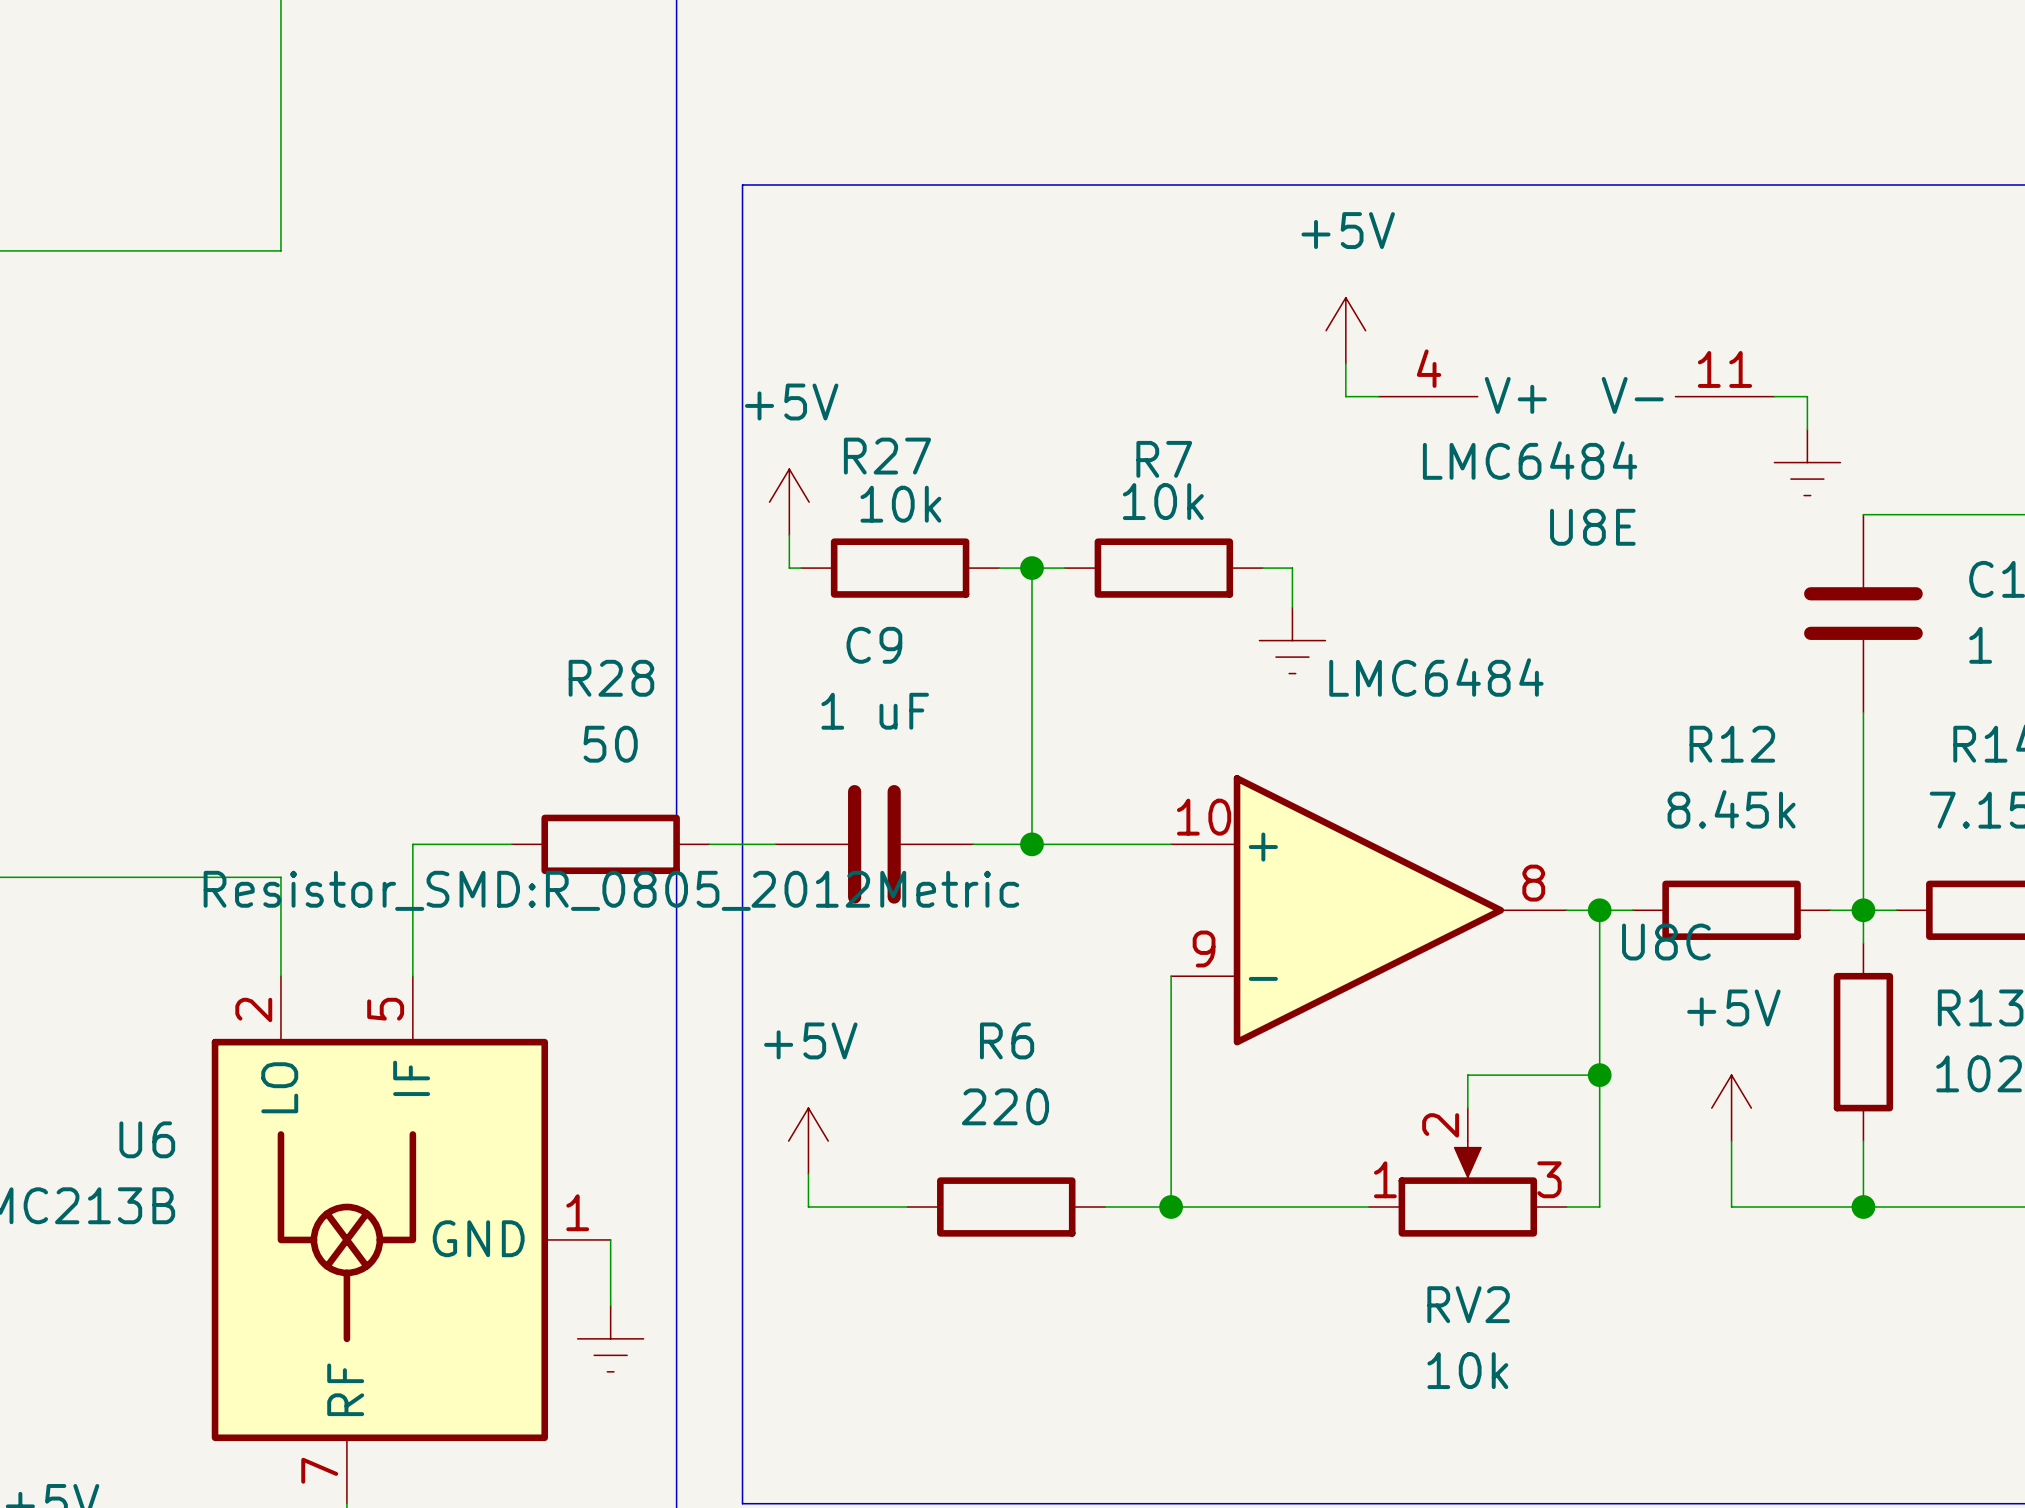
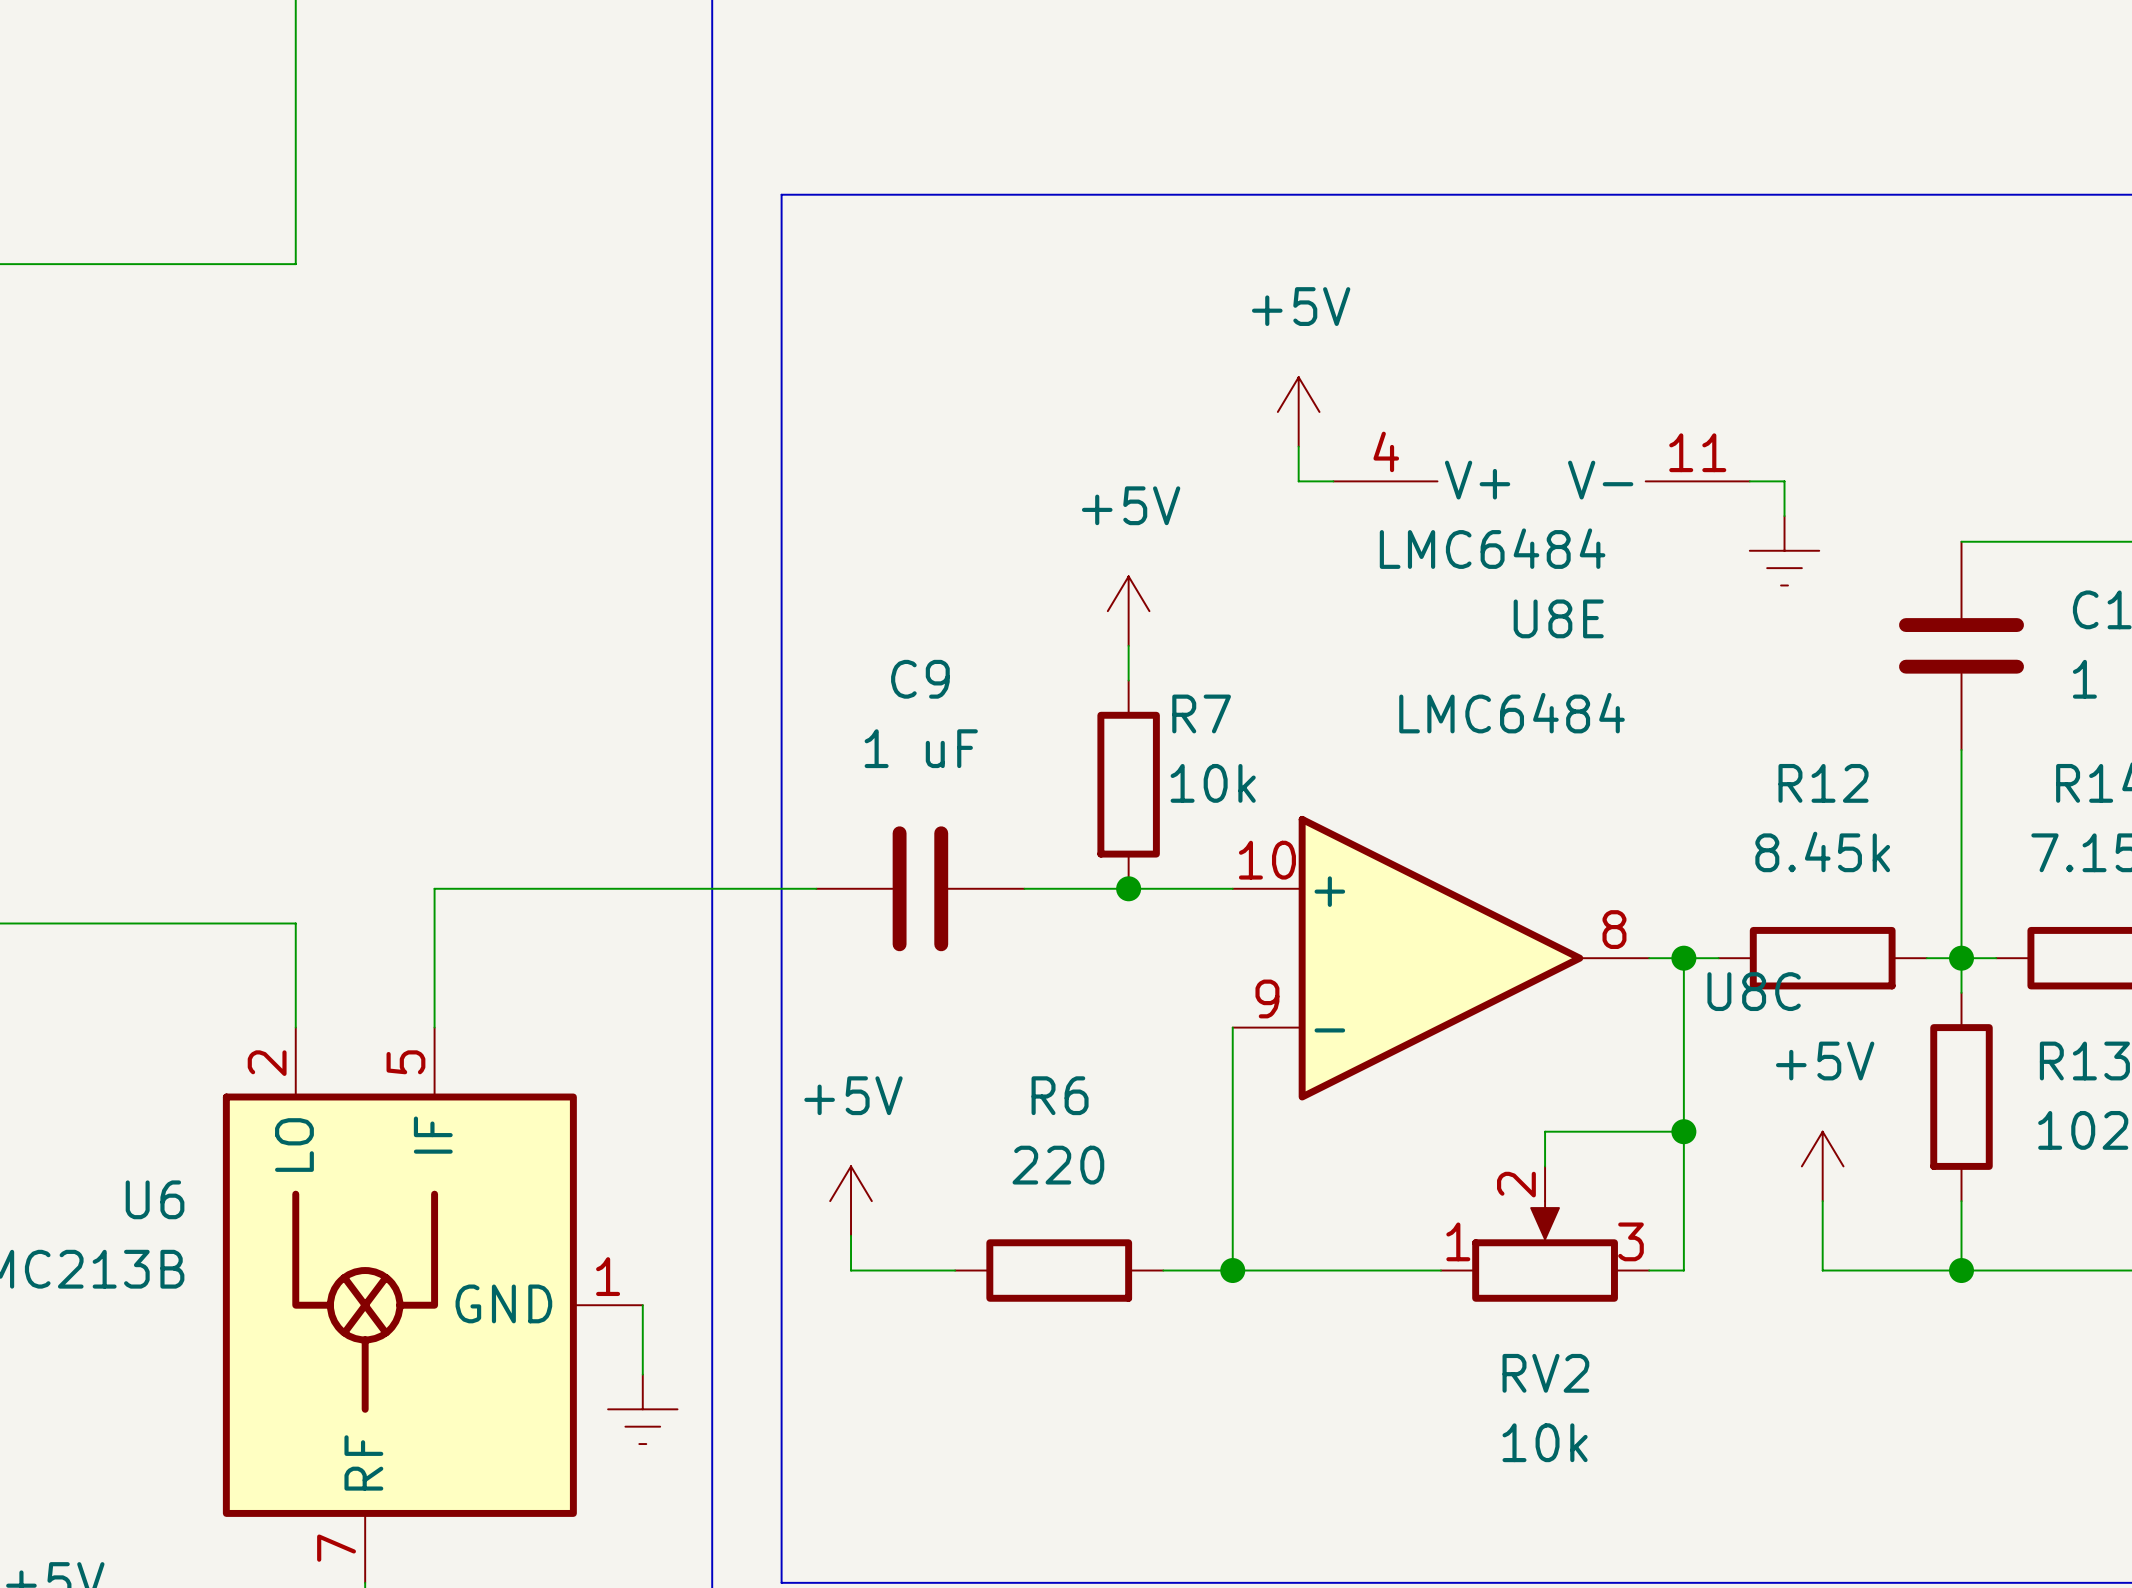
power symbol position: +5V (1345, 330) -> +5V (1298, 411)
wire: (1345, 363) (1345, 396) (1378, 396) -> (1298, 446) (1298, 481) (1333, 481)
U8E position: (1576, 396) -> (1541, 481)
wire: (1774, 396) (1807, 396) (1807, 429) -> (1749, 481) (1784, 481) (1784, 516)
R7 name position: R7 (1164, 459) -> R7 (1201, 713)
power symbol position: (1807, 462) -> (1784, 550)
power symbol: +5V (789, 502) -> none
wire: (789, 535) (789, 568) (801, 568) -> none
R27: 10k (900, 568) -> none
wire: (999, 568) (1064, 568) -> none
wire: (1032, 568) (1032, 844) -> none
junction: (1032, 568) -> none
R7 rotation: 0° (1163, 568) -> 90° clockwise (1128, 784)
R7 position: (1163, 568) -> (1128, 784)
wire: (1262, 568) (1292, 568) (1292, 607) -> none
power symbol: none -> +5V (1128, 611)
wire: none -> (1128, 645) (1128, 680)
power symbol: (1292, 640) -> none
wire: none -> (538, 888) (746, 888)
R28: 50 (610, 844) -> none
junction position: (1032, 844) -> (1128, 888)

